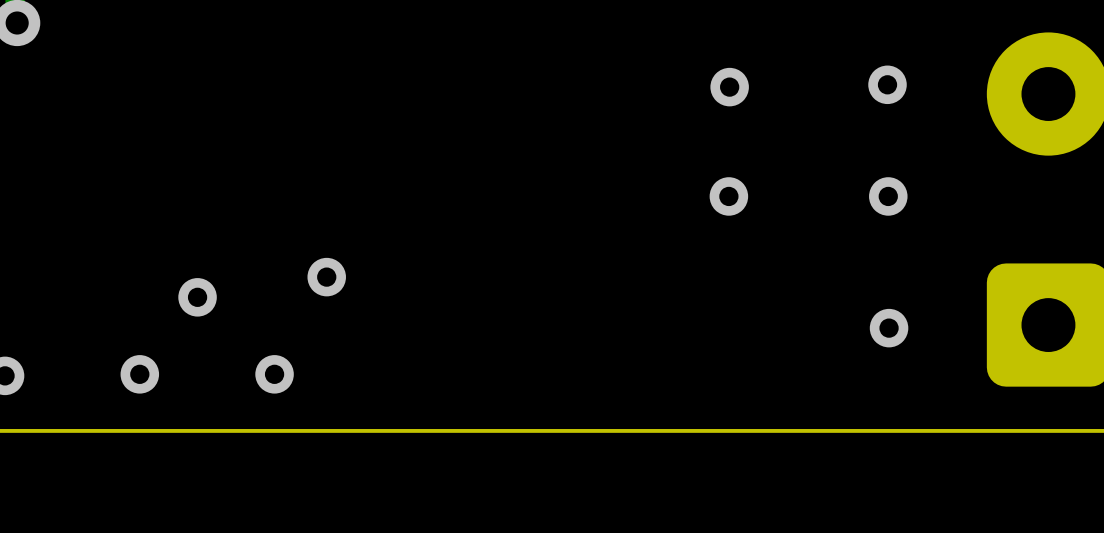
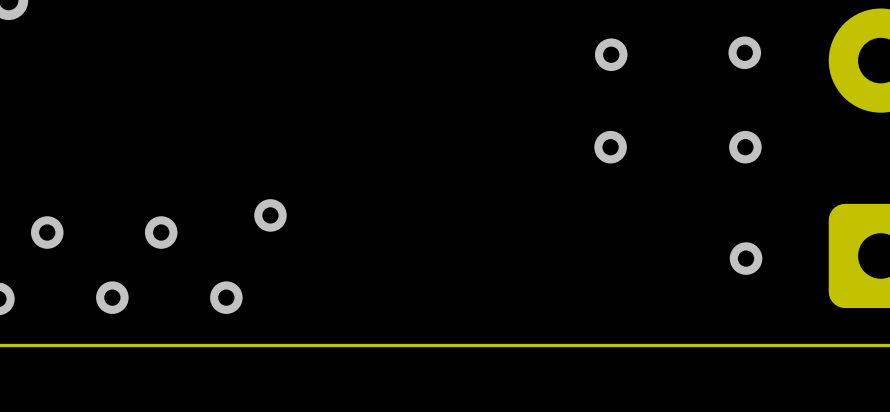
via: none -> (47, 232)

